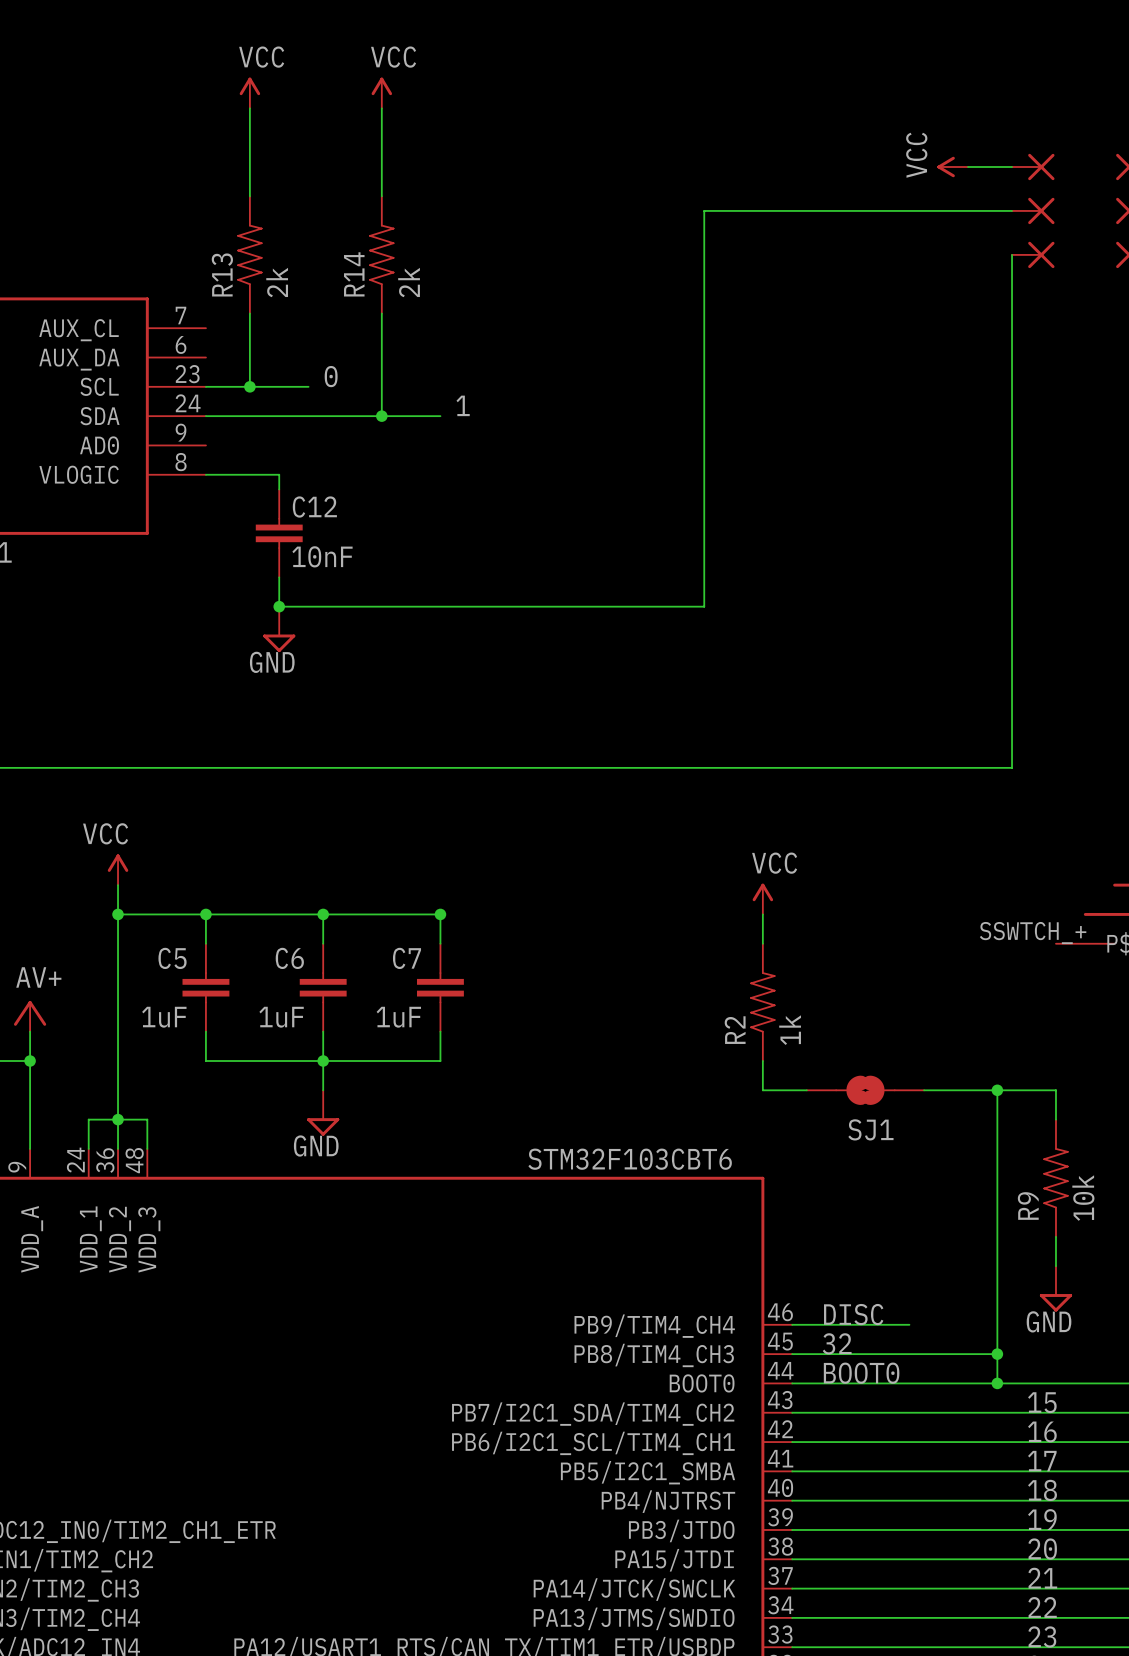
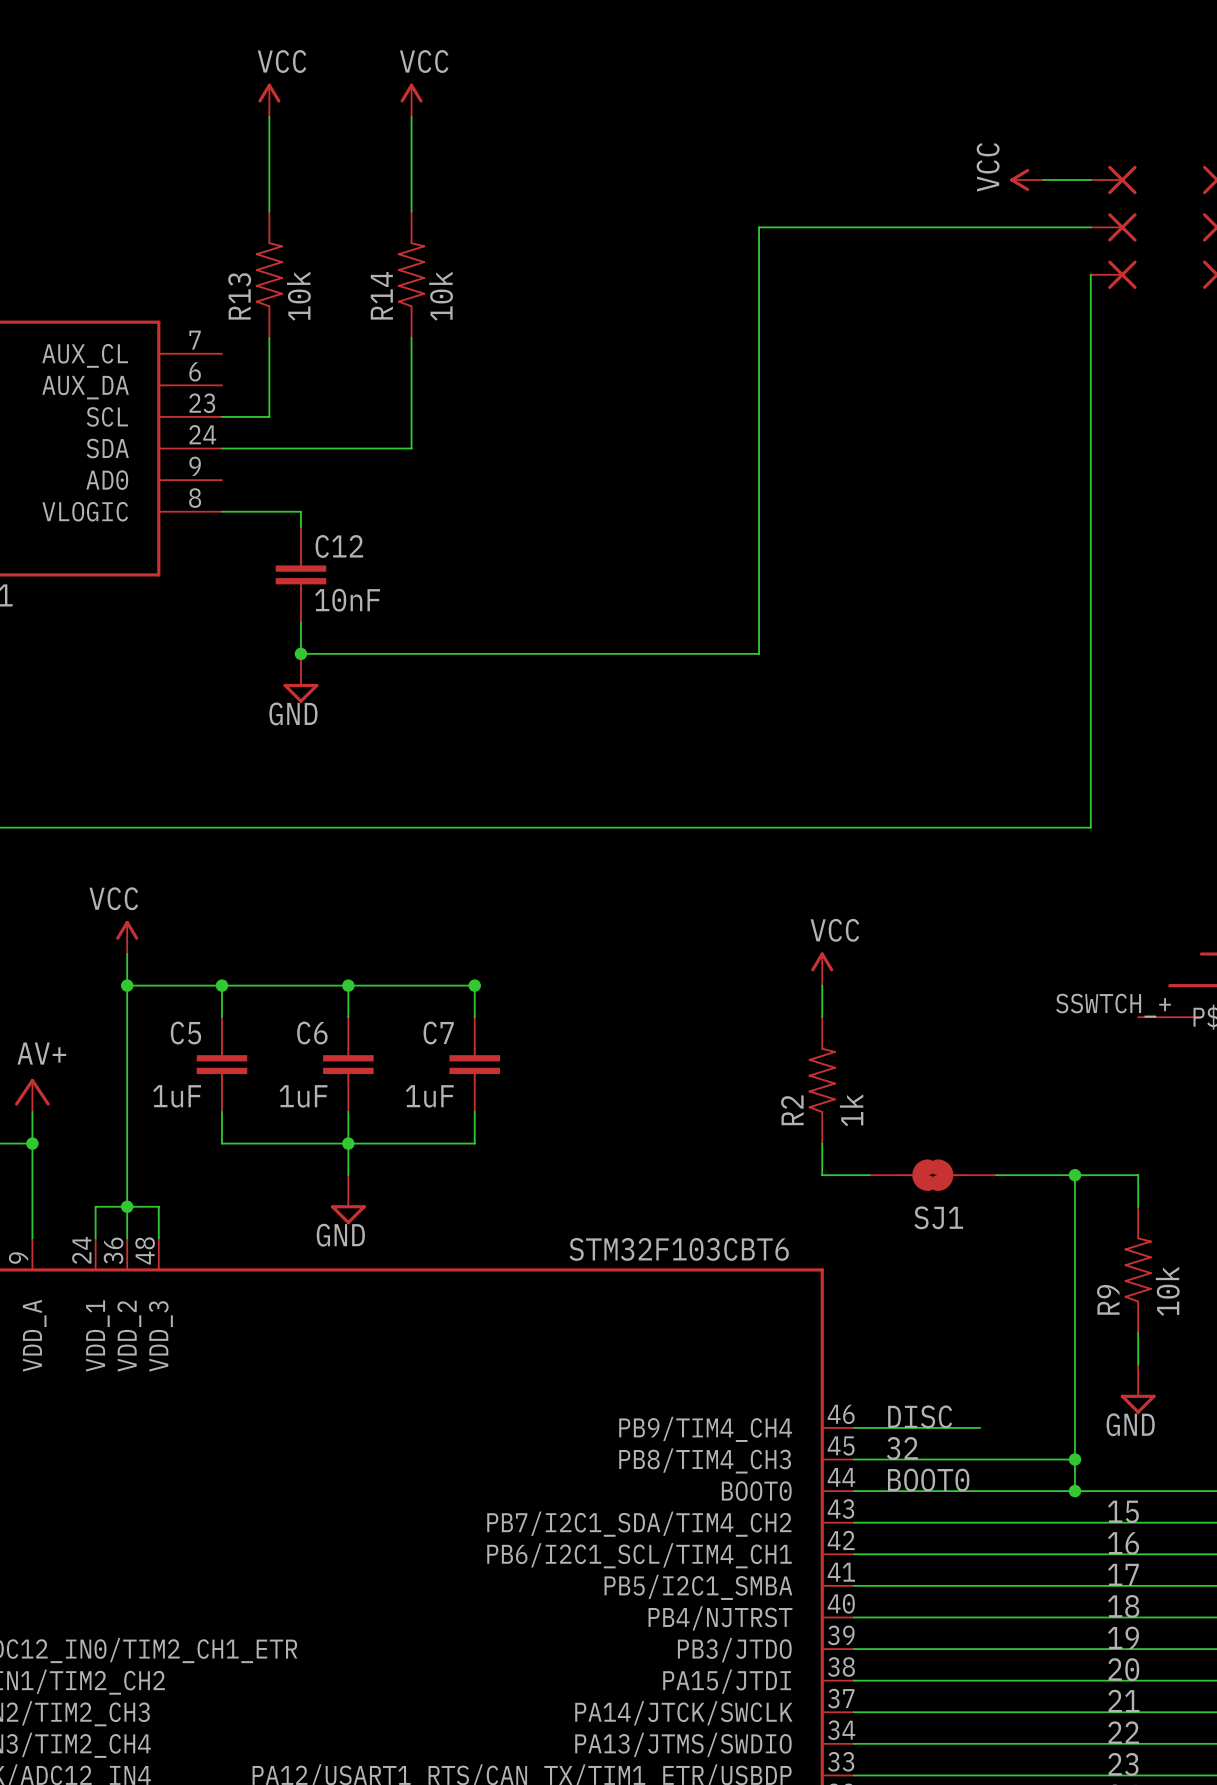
R13 value: 2k (277, 282) -> 10k (298, 296)
R14 value: 2k (409, 282) -> 10k (441, 296)
label: 0 (331, 376) -> none
wire: (249, 386) (308, 386) -> none
junction: (249, 386) -> none
label: 1 (463, 405) -> none
wire: (381, 416) (440, 416) -> none
junction: (381, 416) -> none

